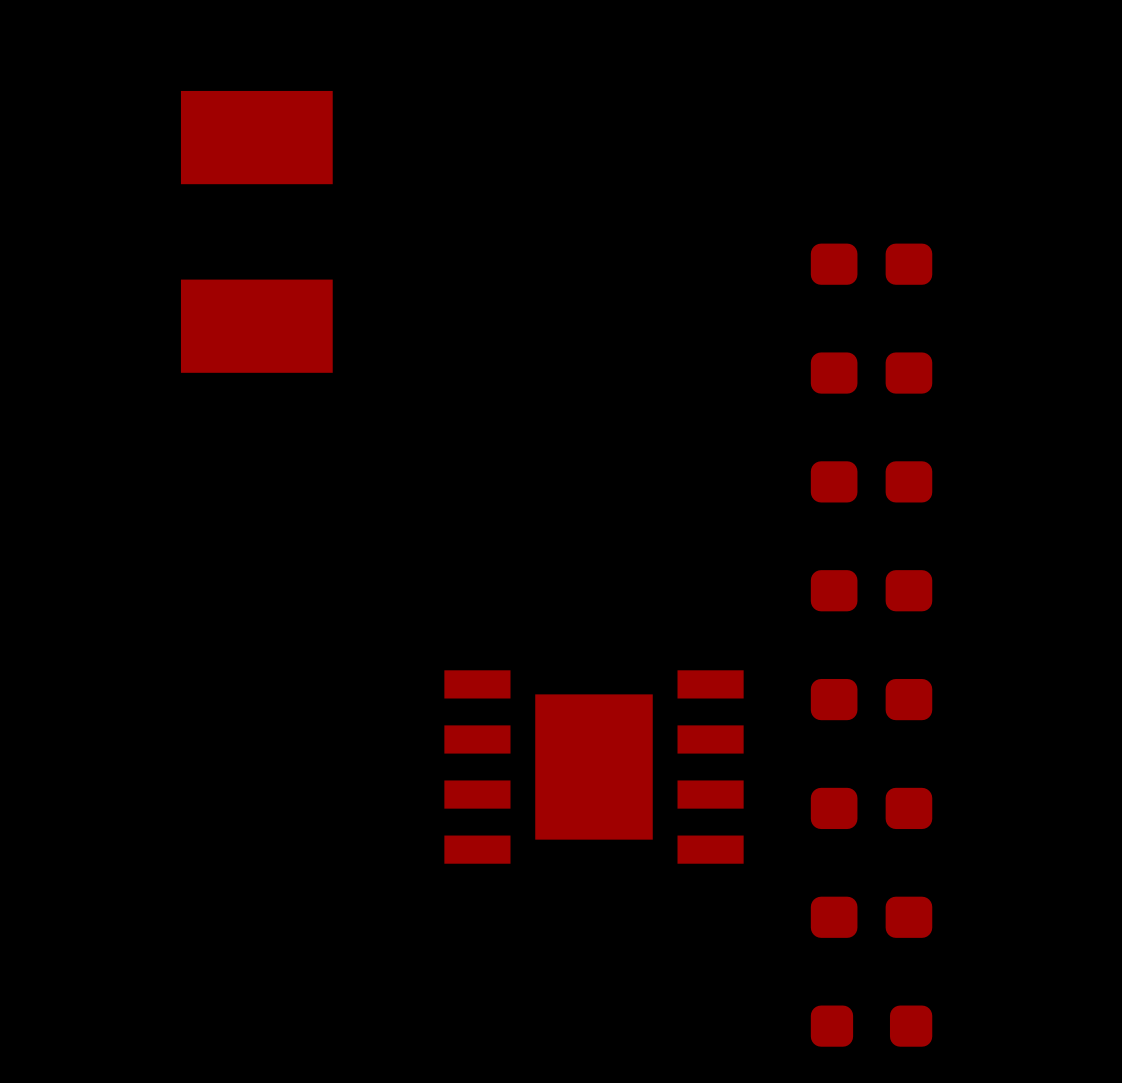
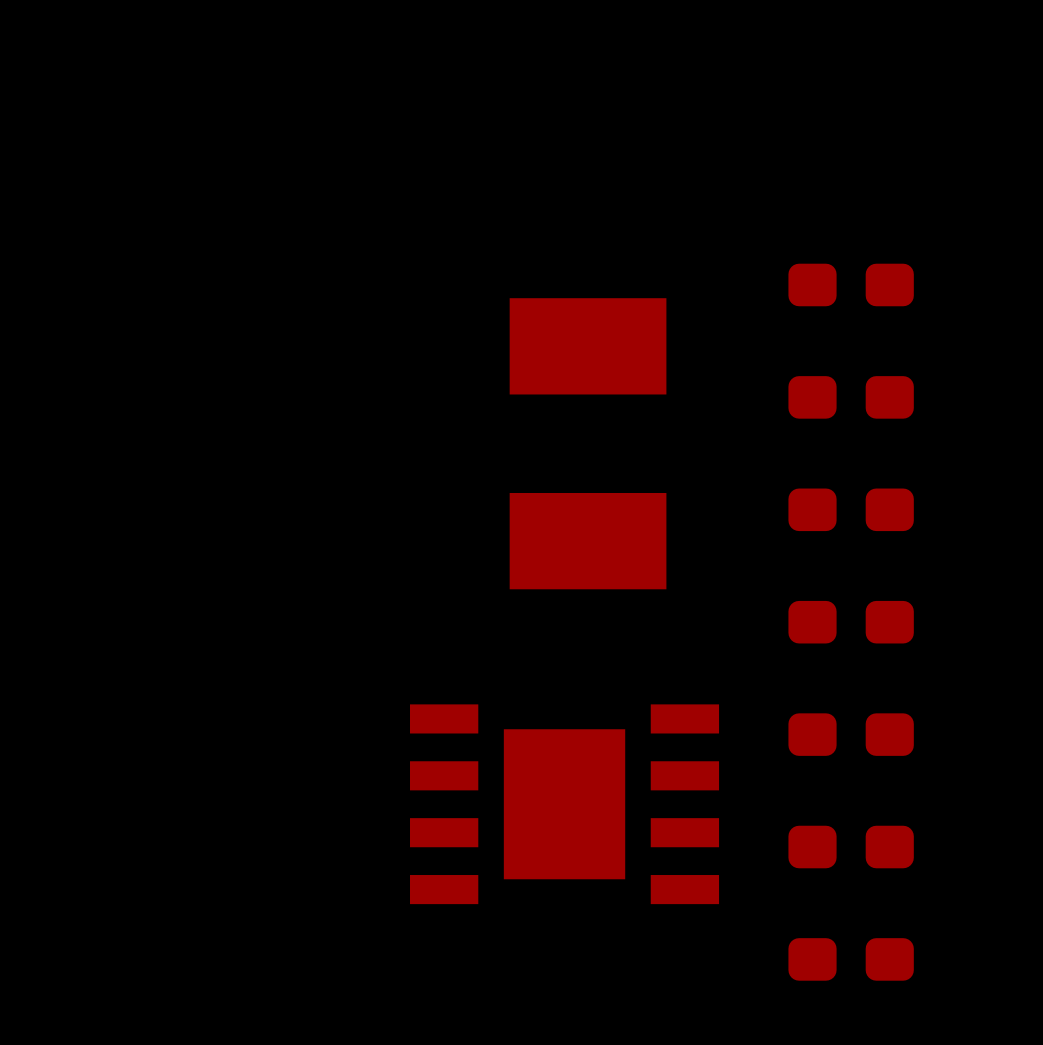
part position: (256, 231) -> (588, 443)

